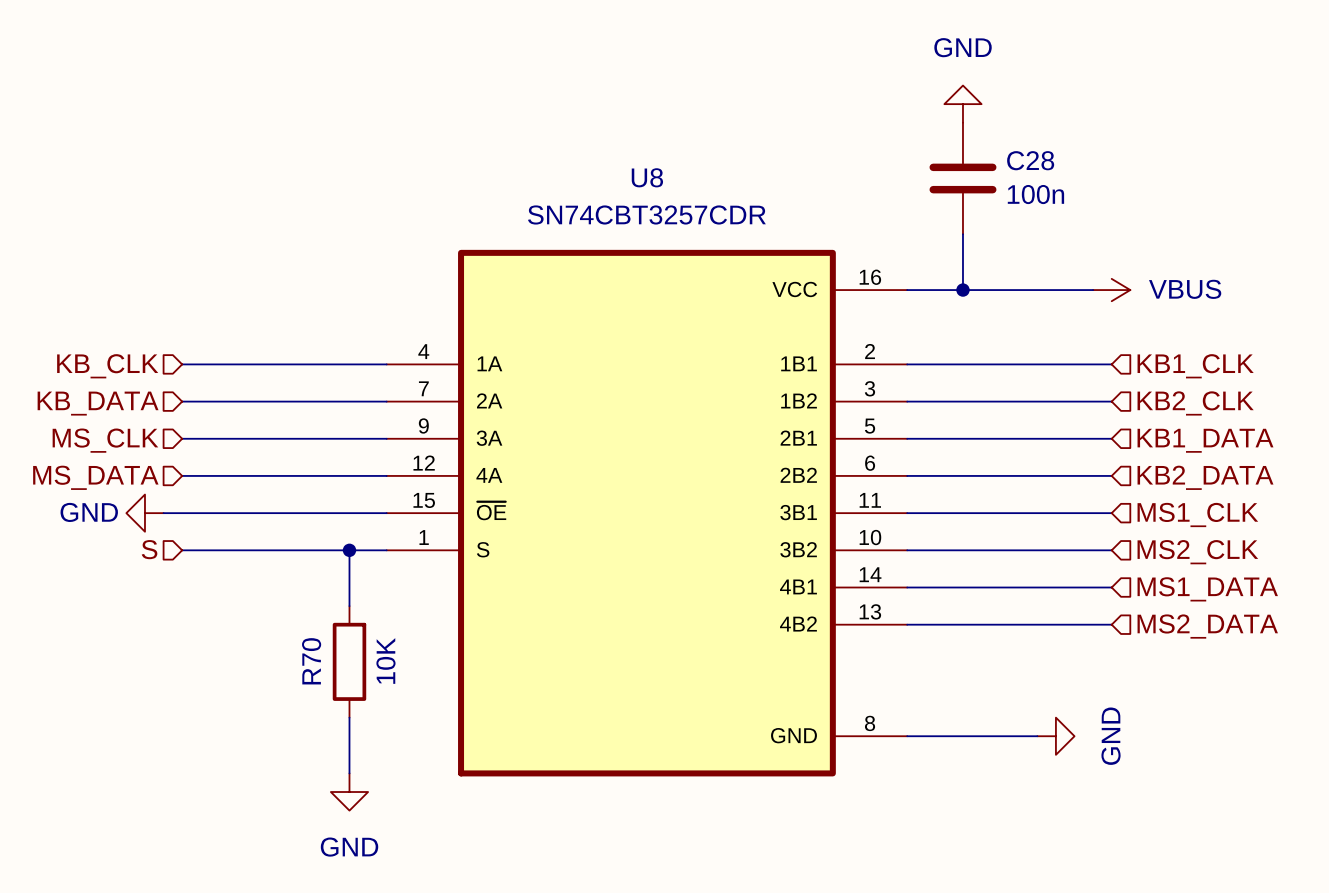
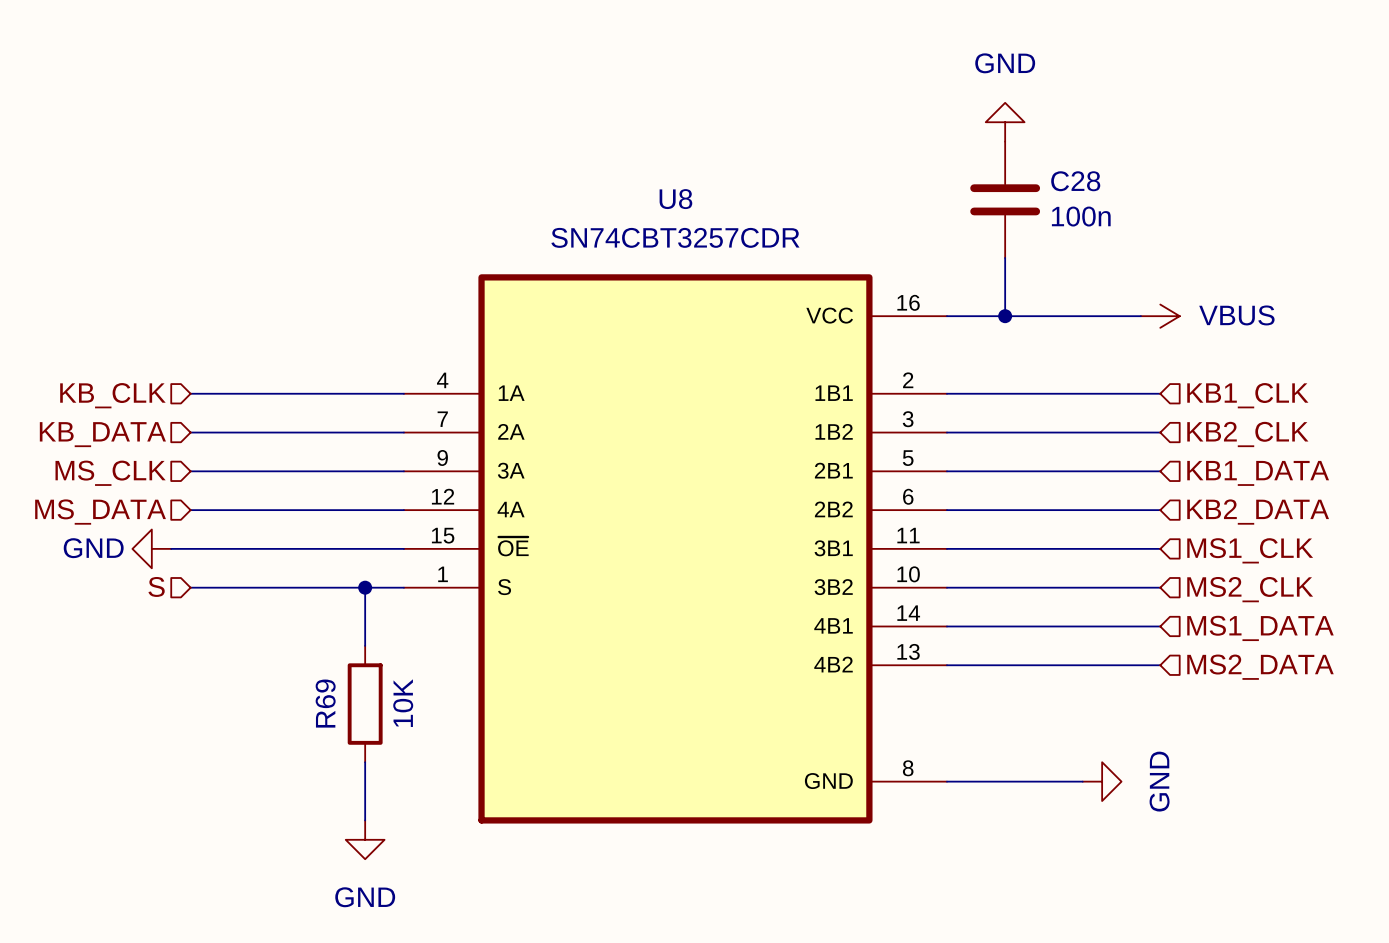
R70 name: R70 (311, 661) -> R69 (325, 703)

